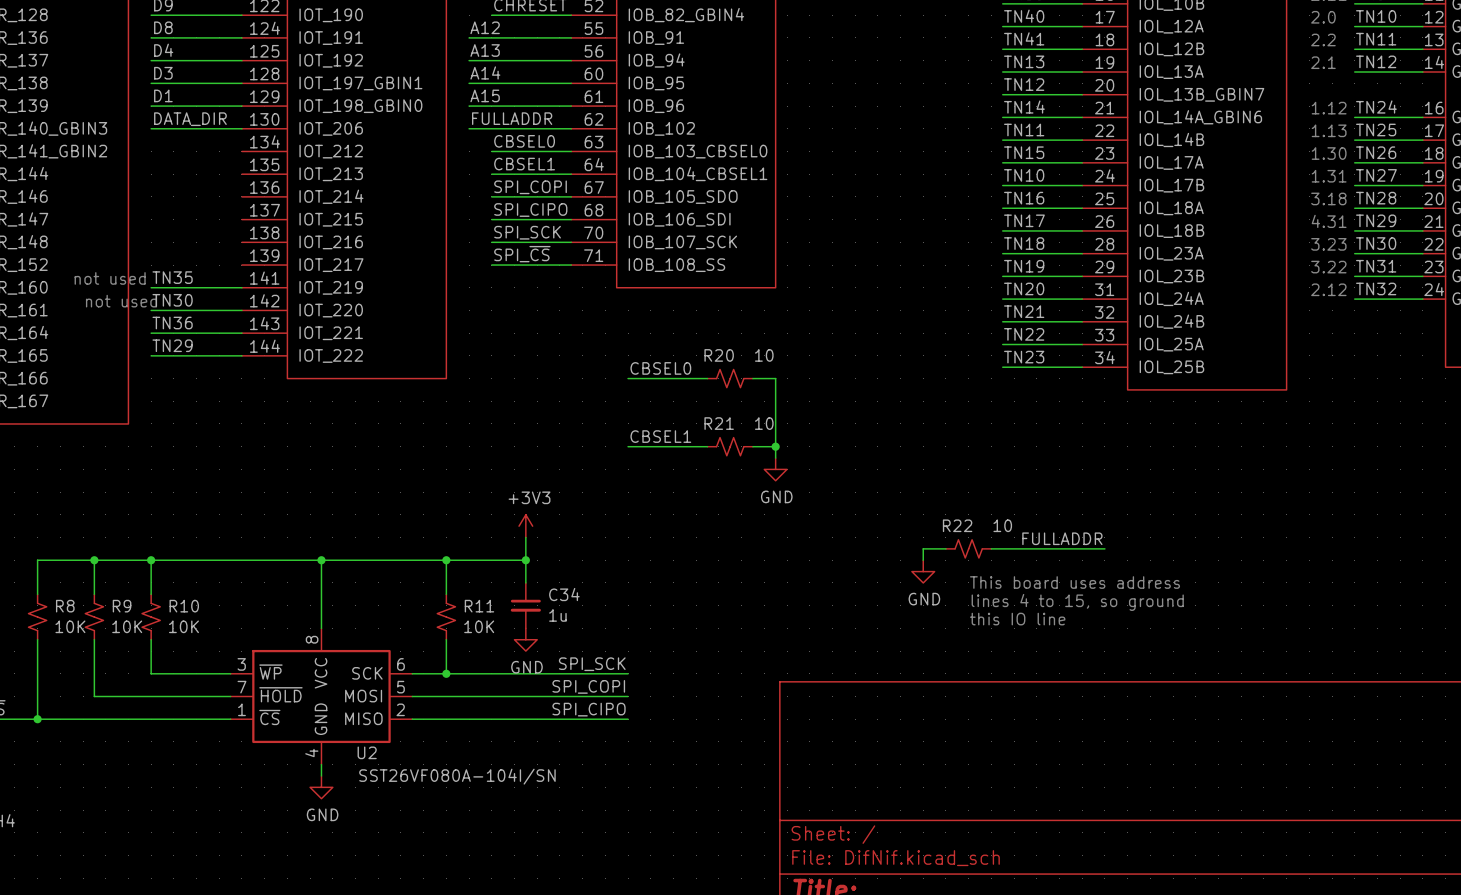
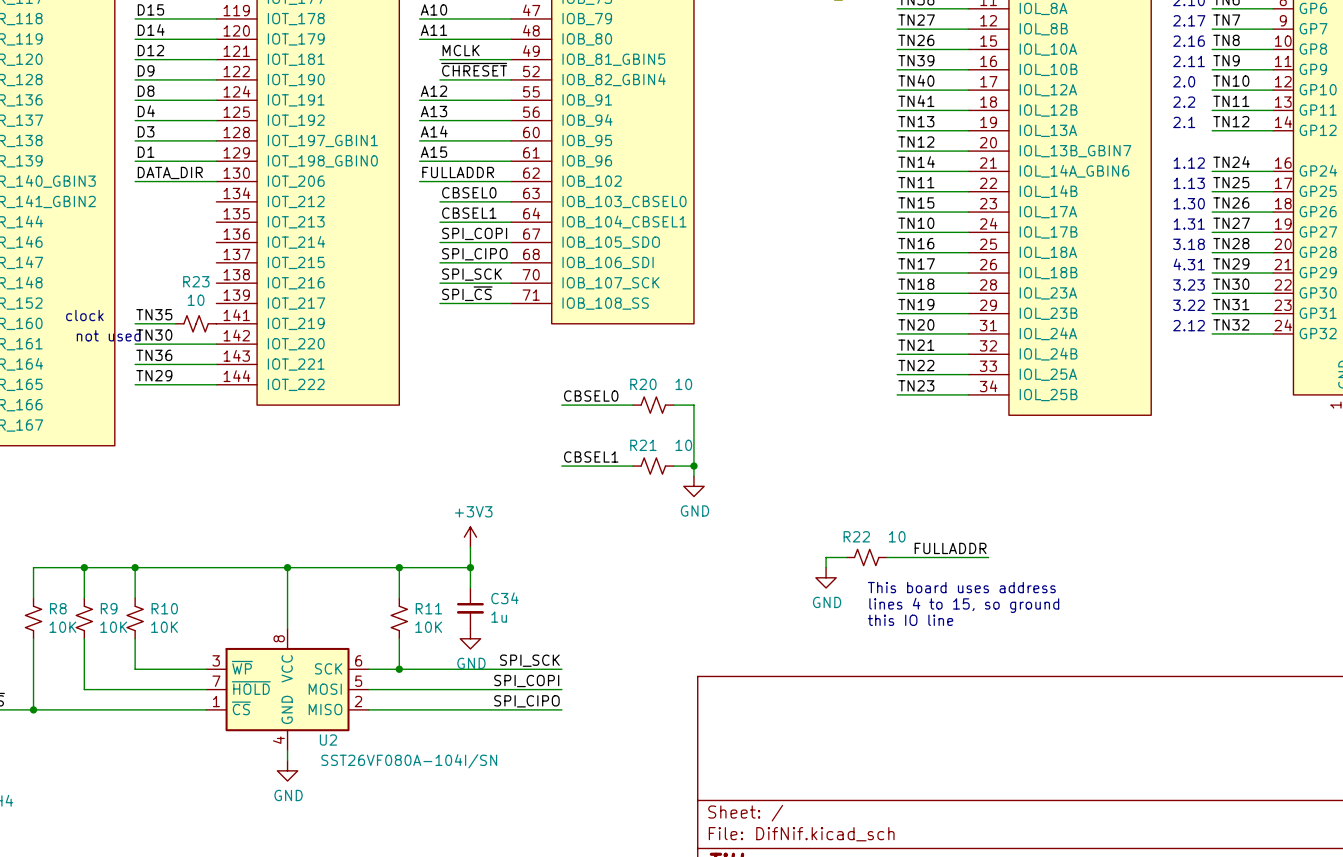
text: not used (110, 278) -> clock (84, 315)
R23: none -> 10 (196, 323)

